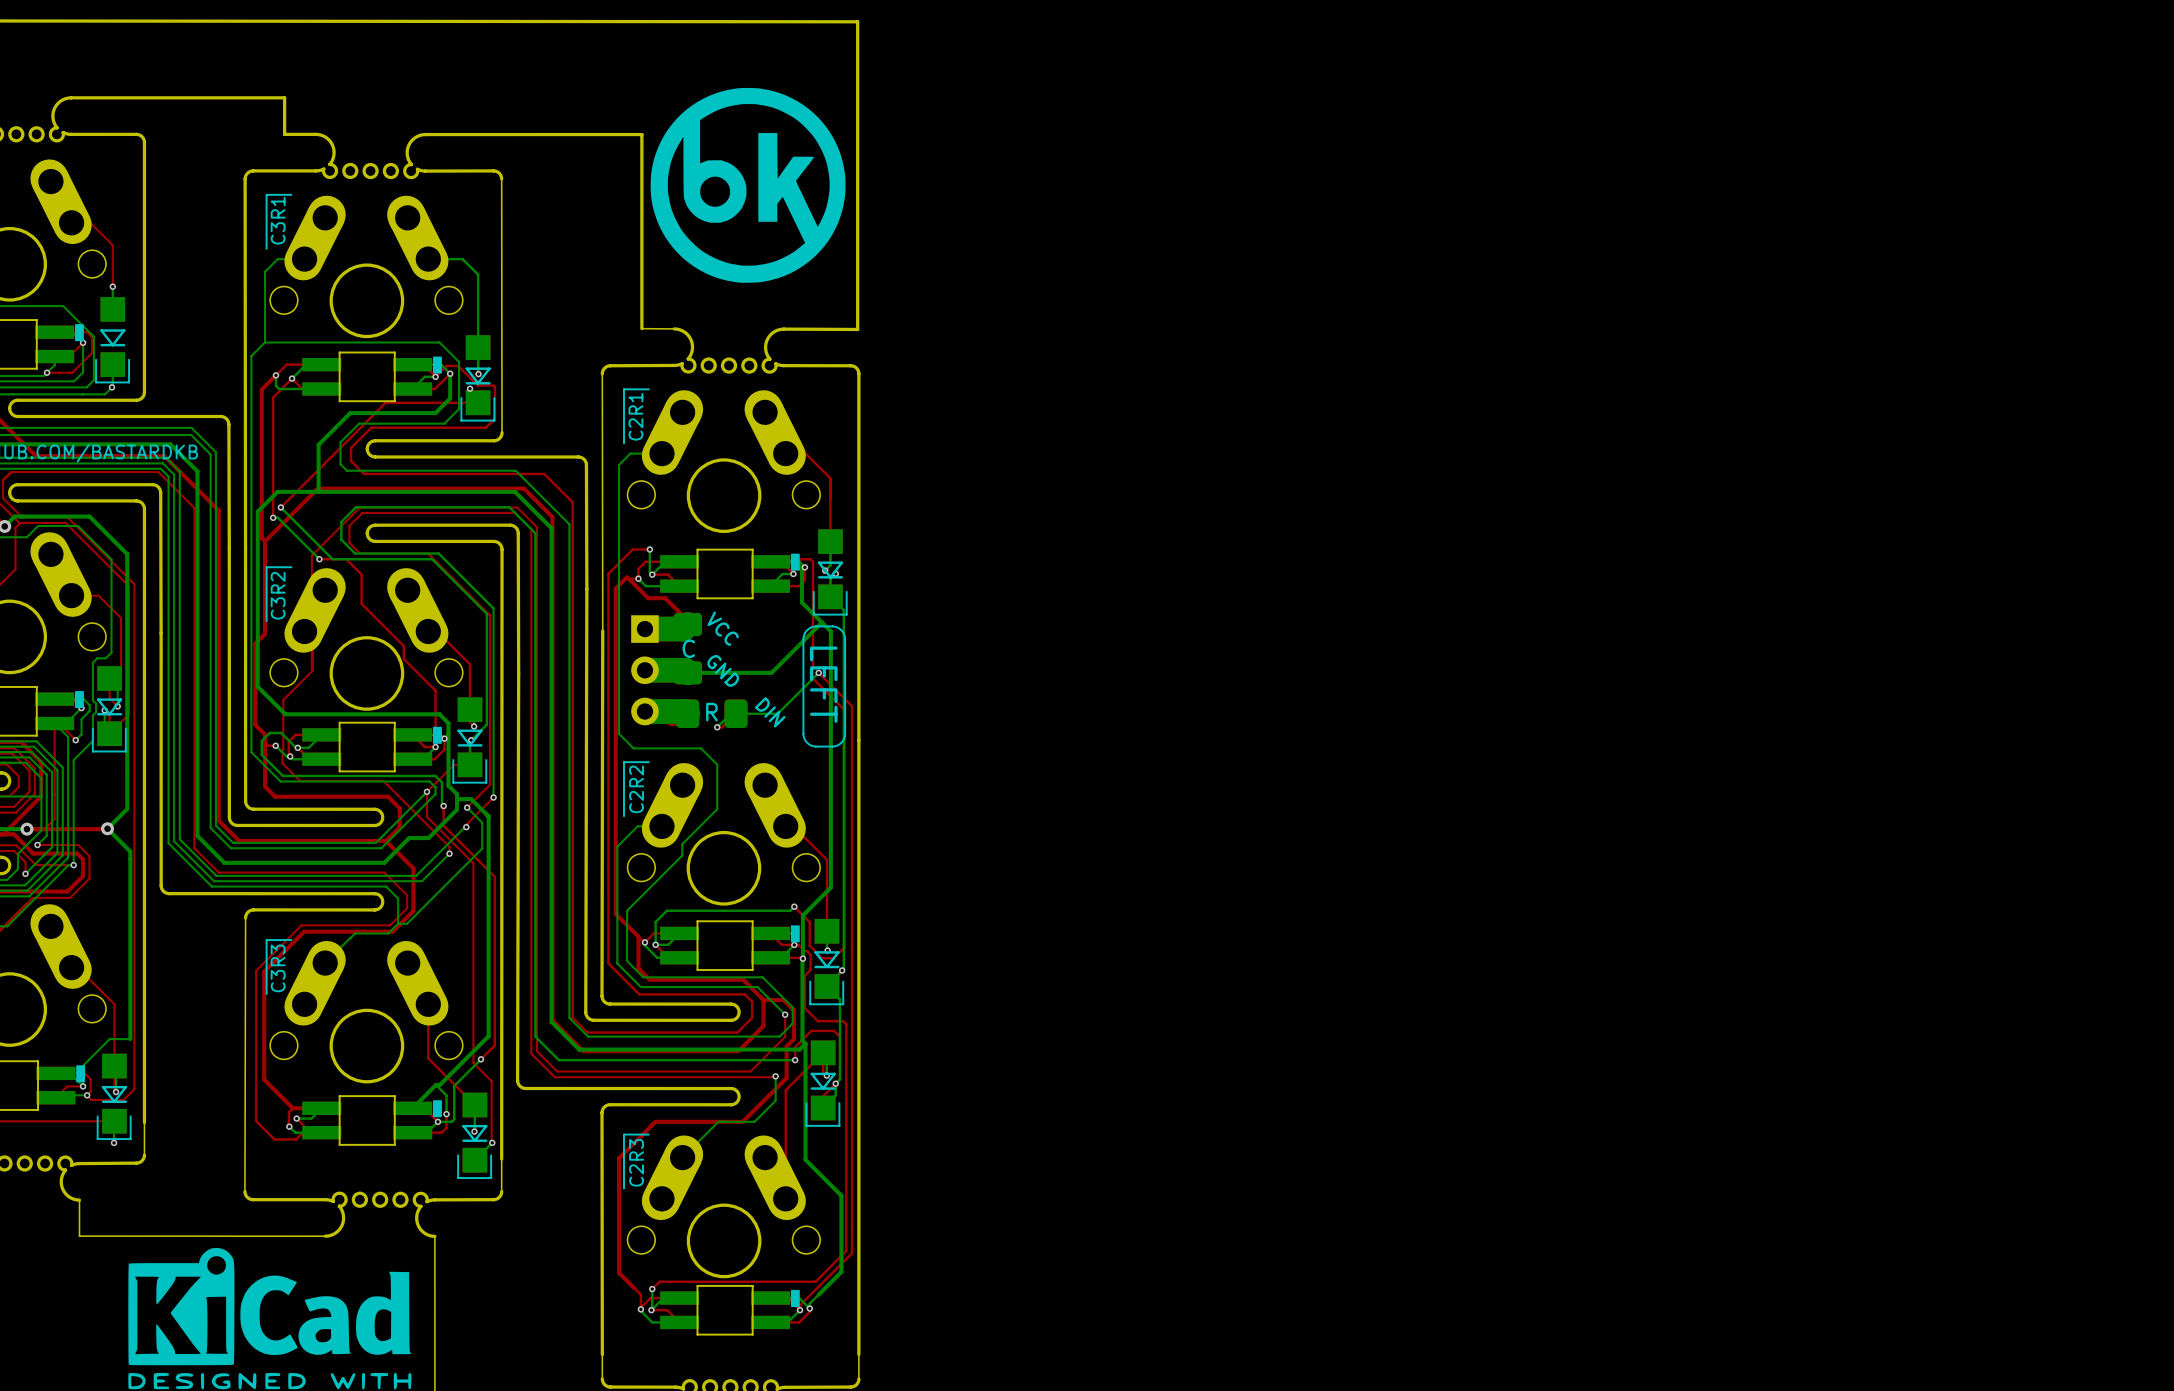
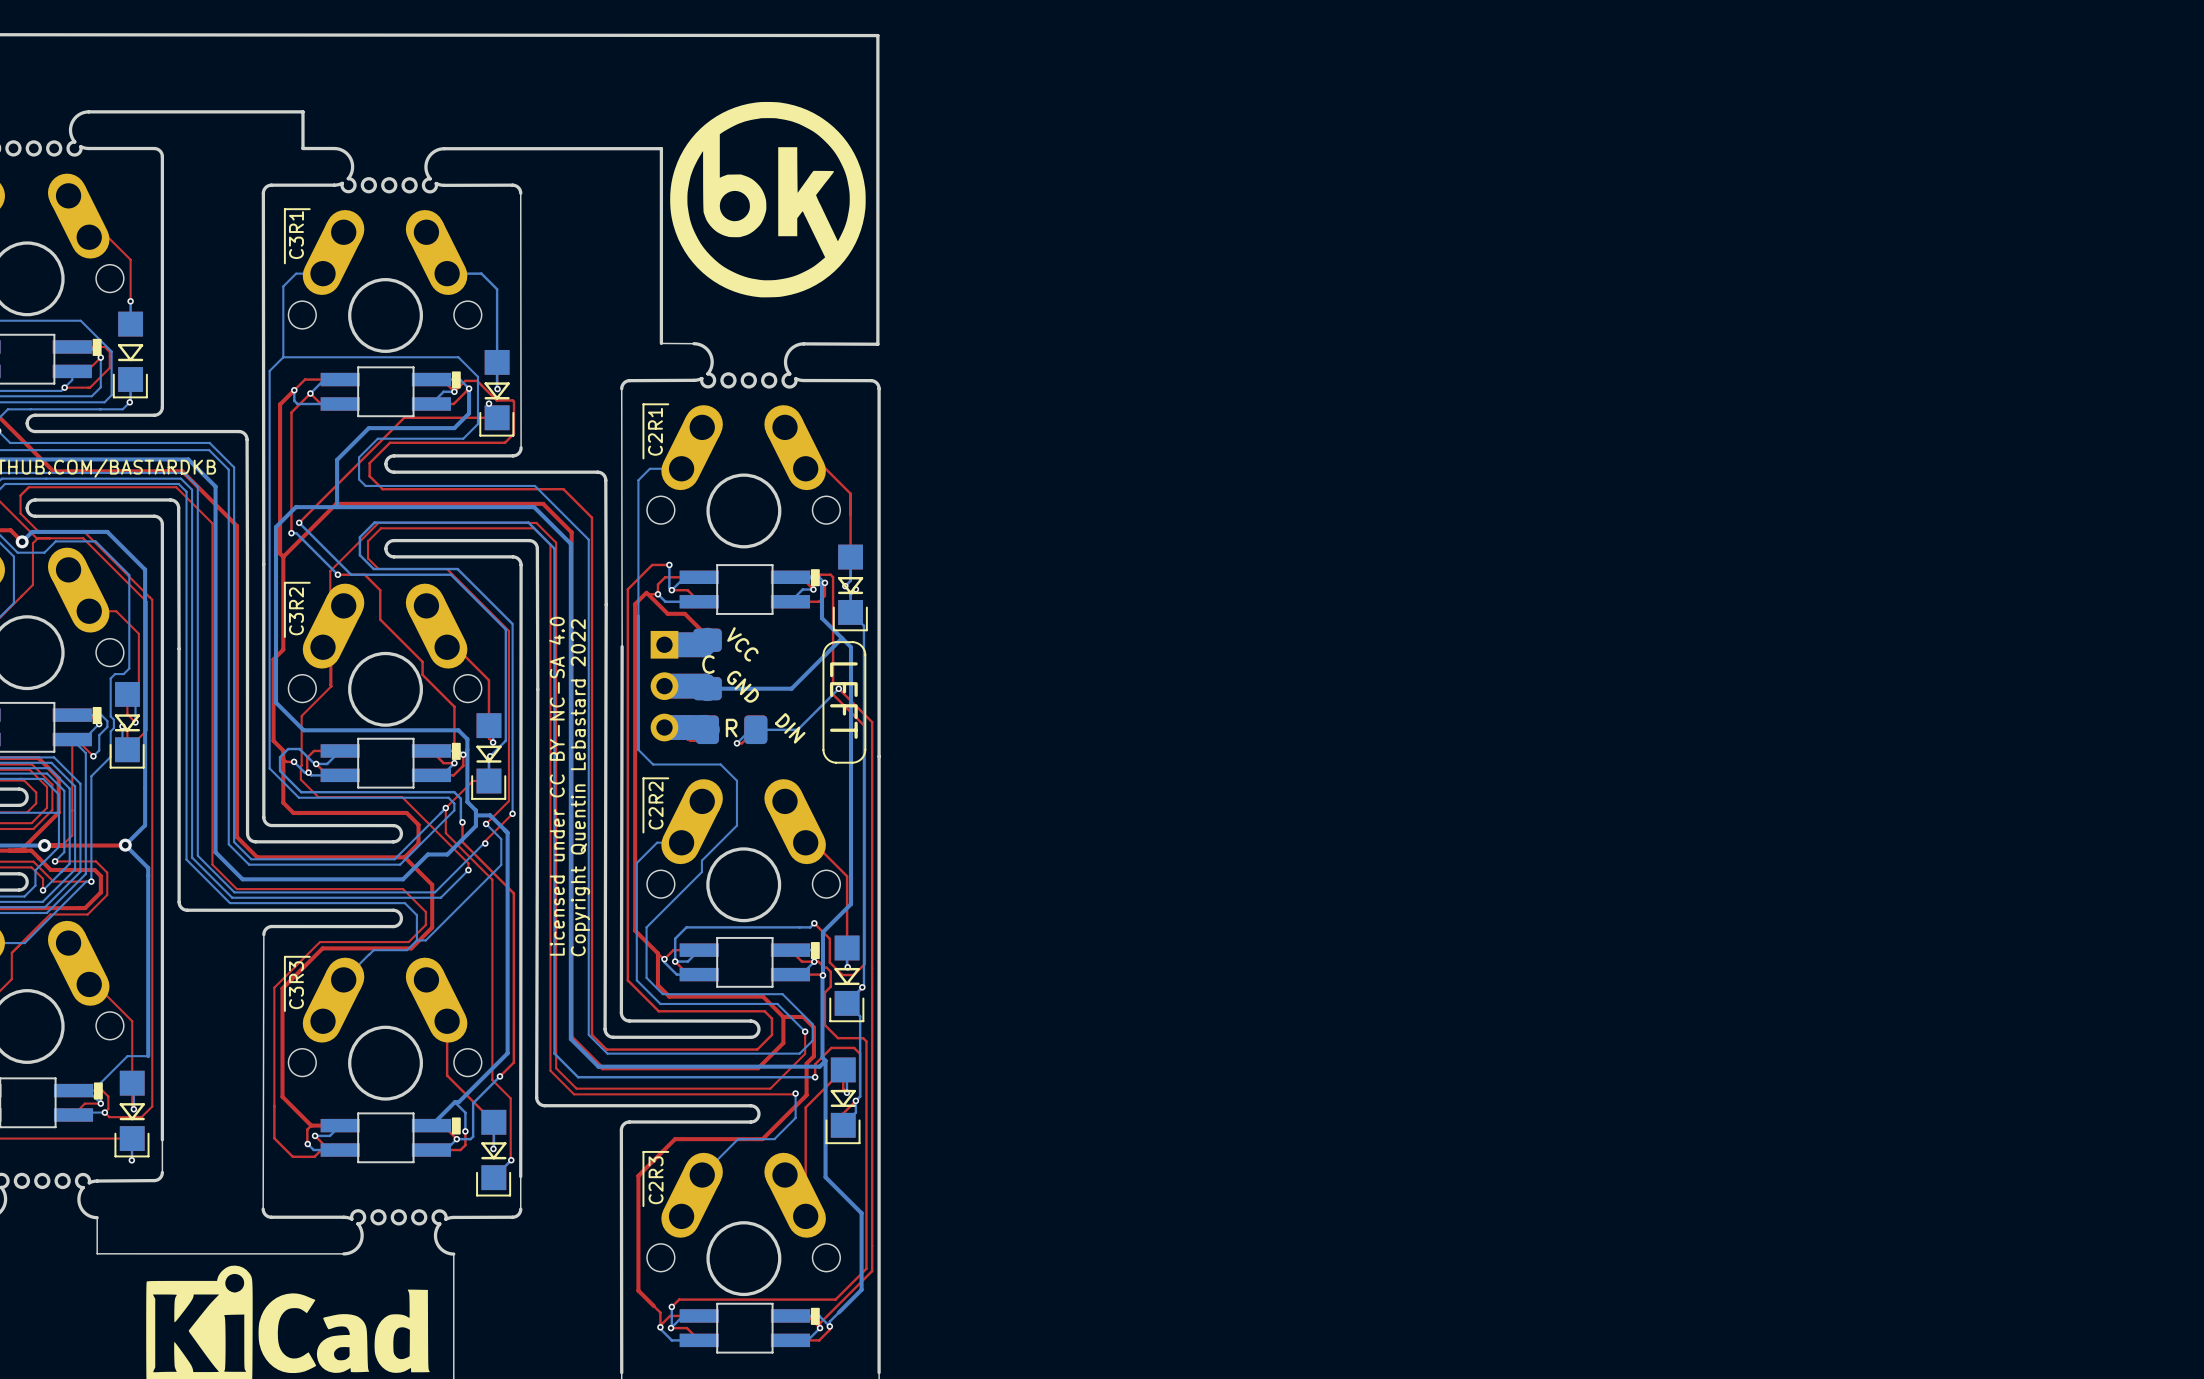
text: none -> Licensed under CC BY-NC-SA 4.0 (556, 786)
text: none -> Copyright Quentin Lebastard 2022 (580, 787)

